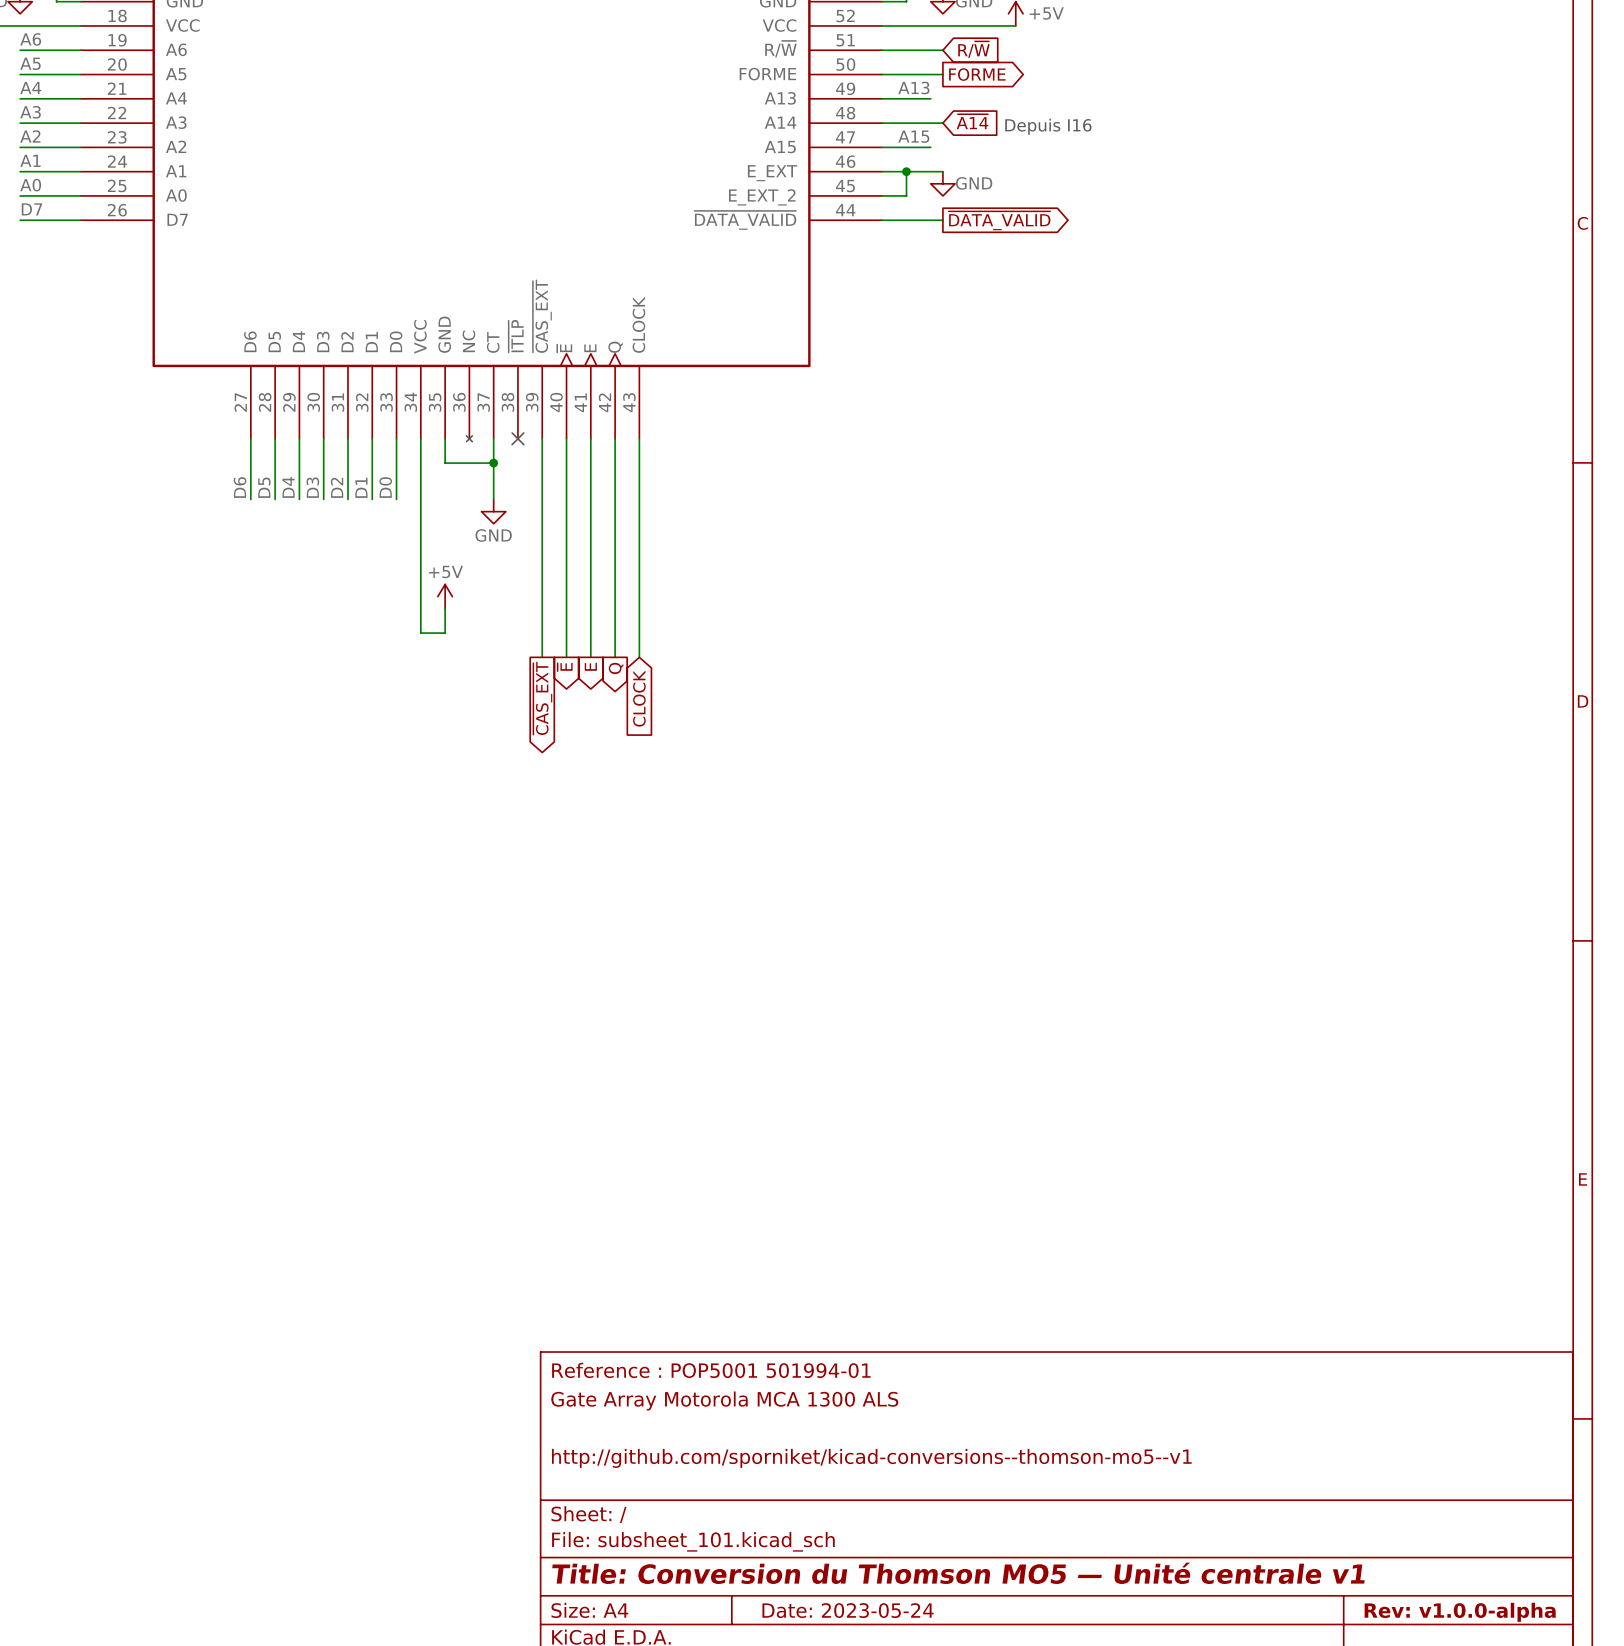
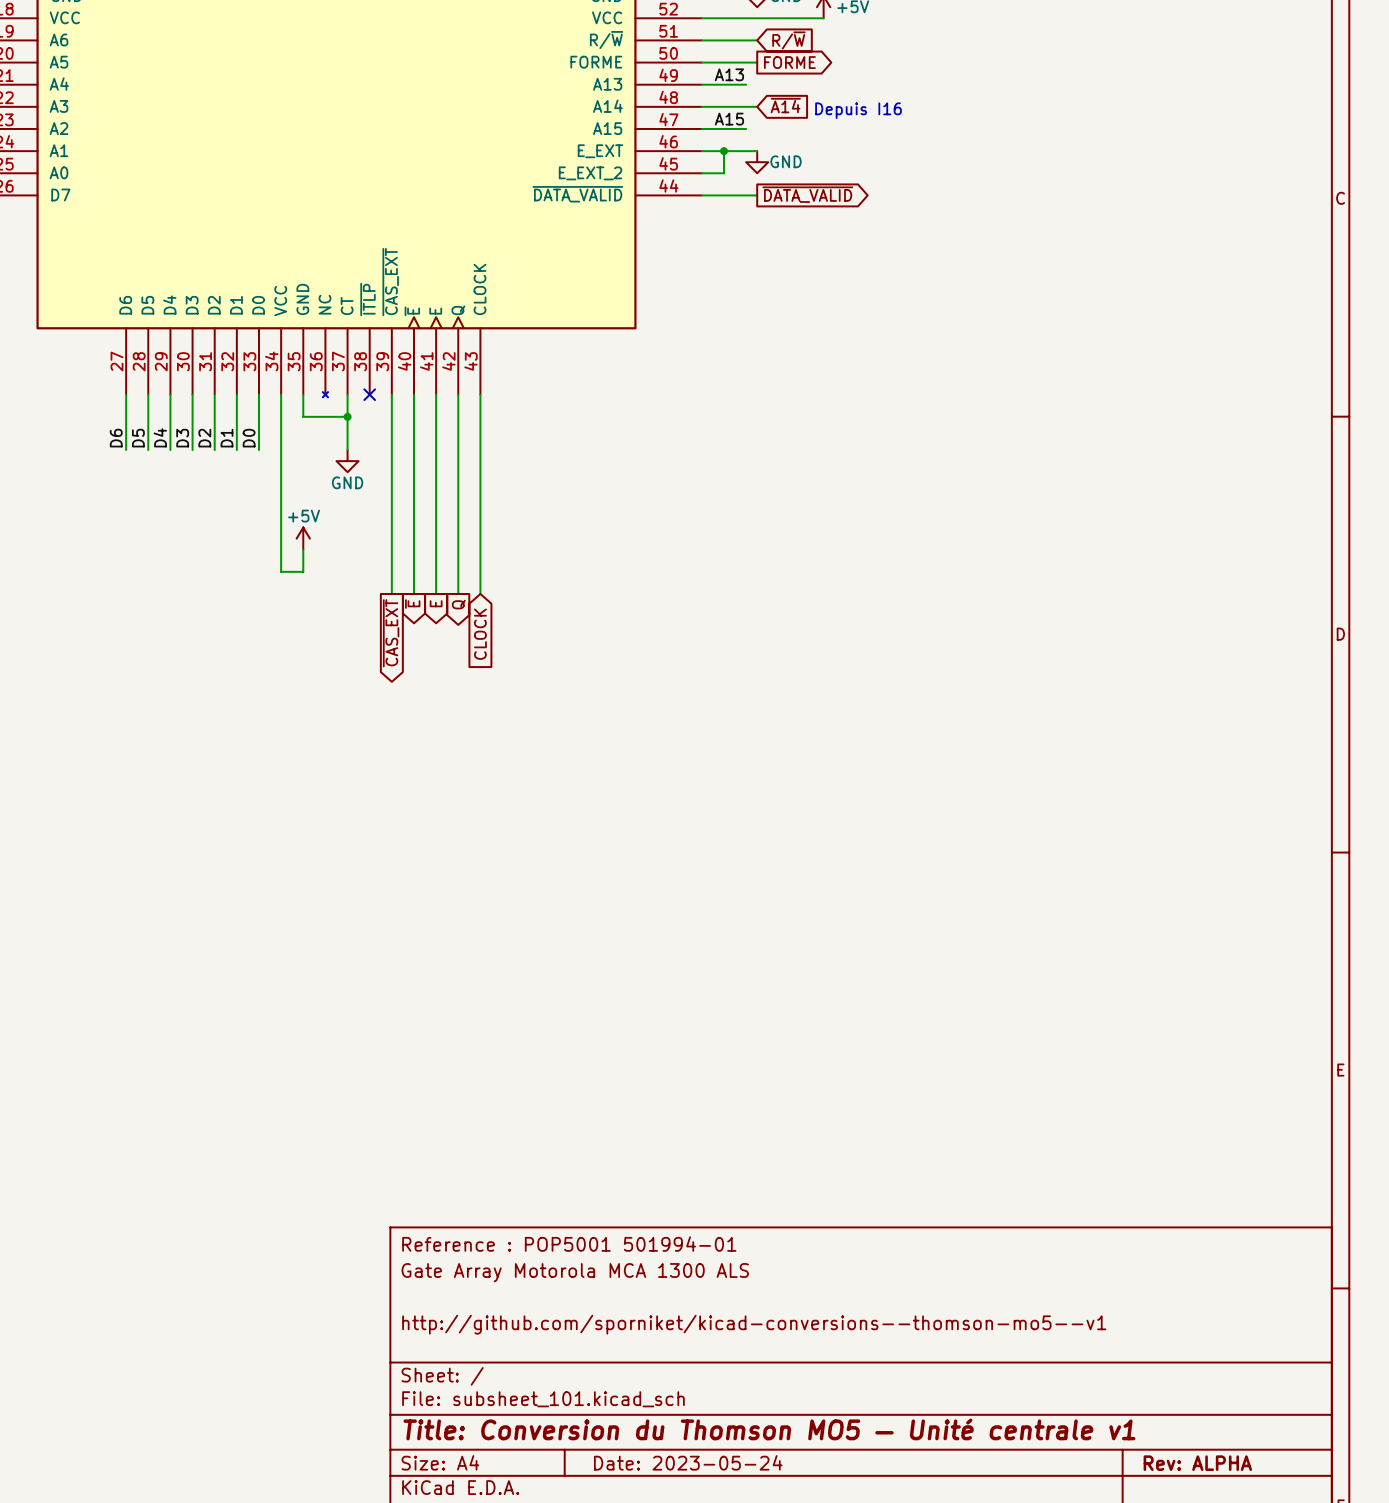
title block: Rev: v1.0.0-alpha (1460, 1612) -> Rev: ALPHA (1197, 1463)

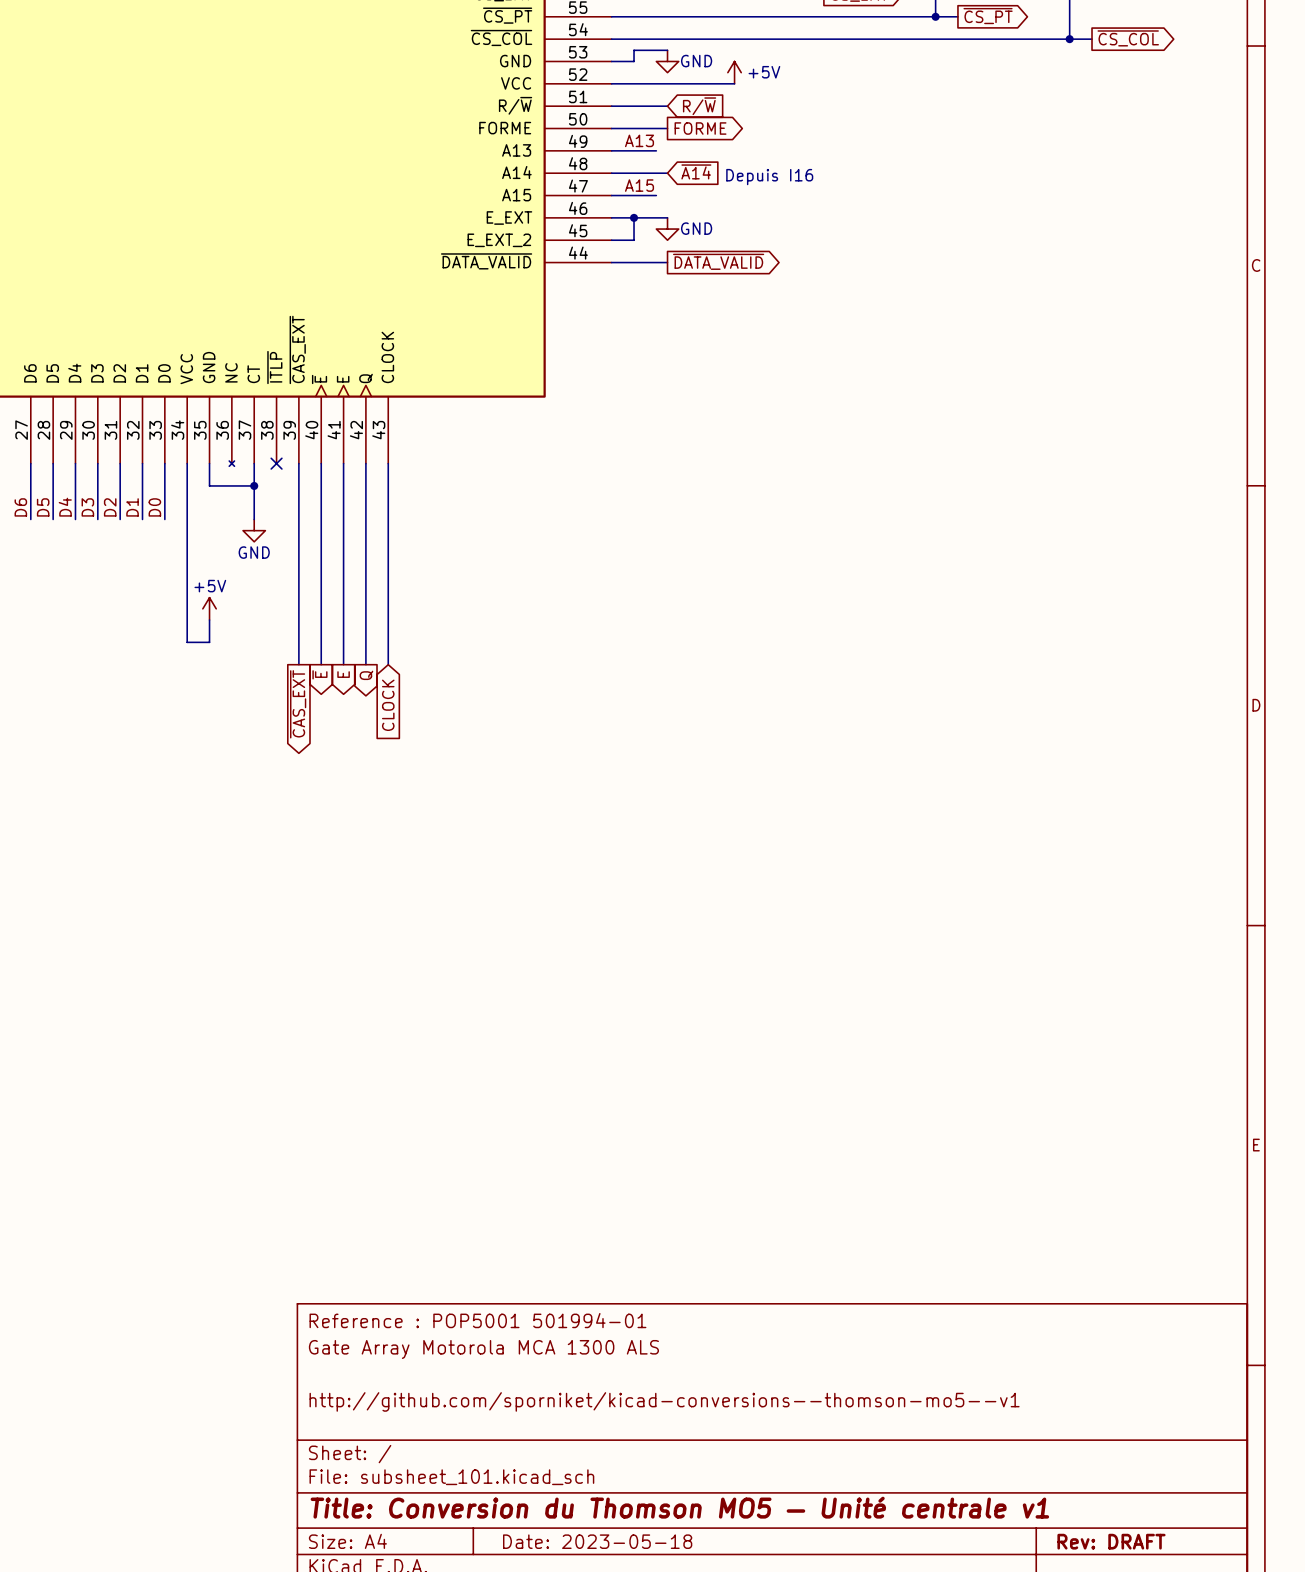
title block: Date: 2023-05-24 (688, 1462) -> Date: 2023-05-18 (597, 1541)
title block: Rev: ALPHA (1197, 1463) -> Rev: DRAFT (1111, 1541)

